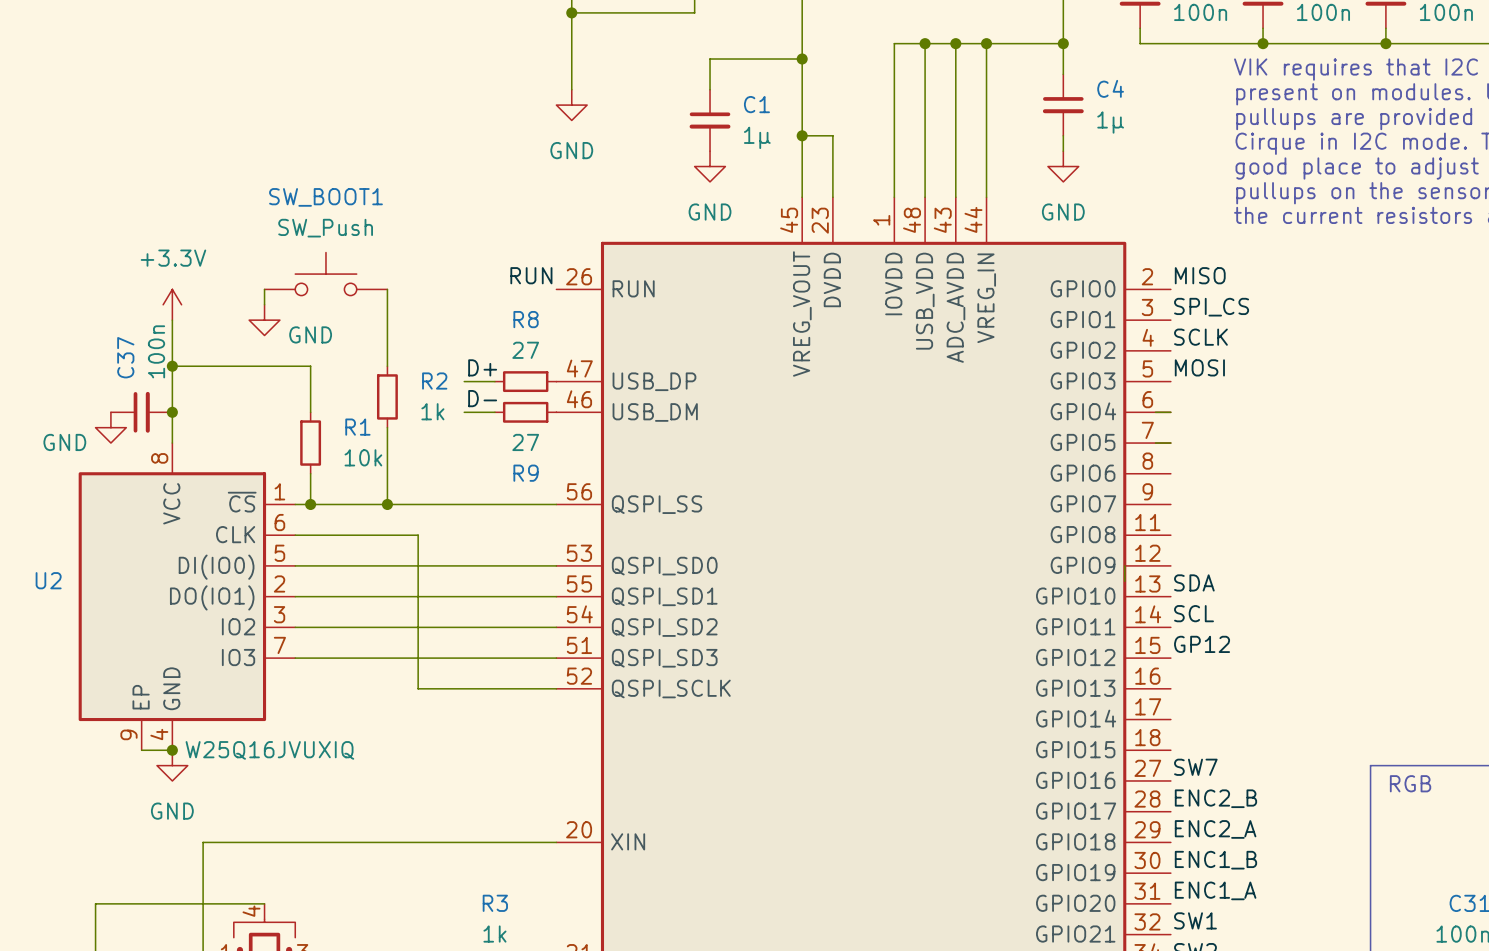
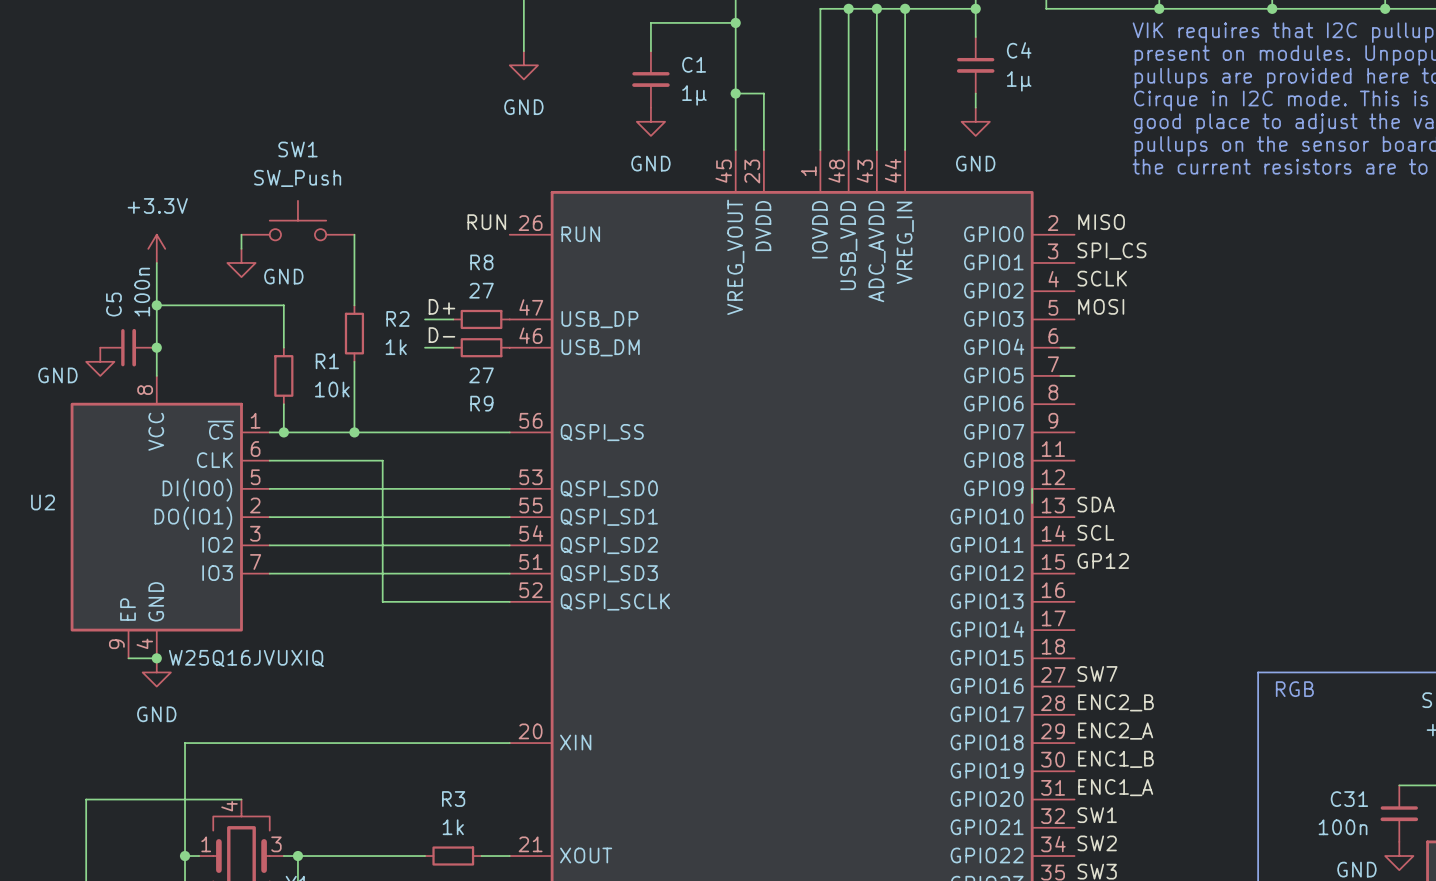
SW_BOOT1 name: SW_BOOT1 (325, 197) -> SW1 (297, 149)
C37 name: C37 (125, 357) -> C5 (113, 304)

